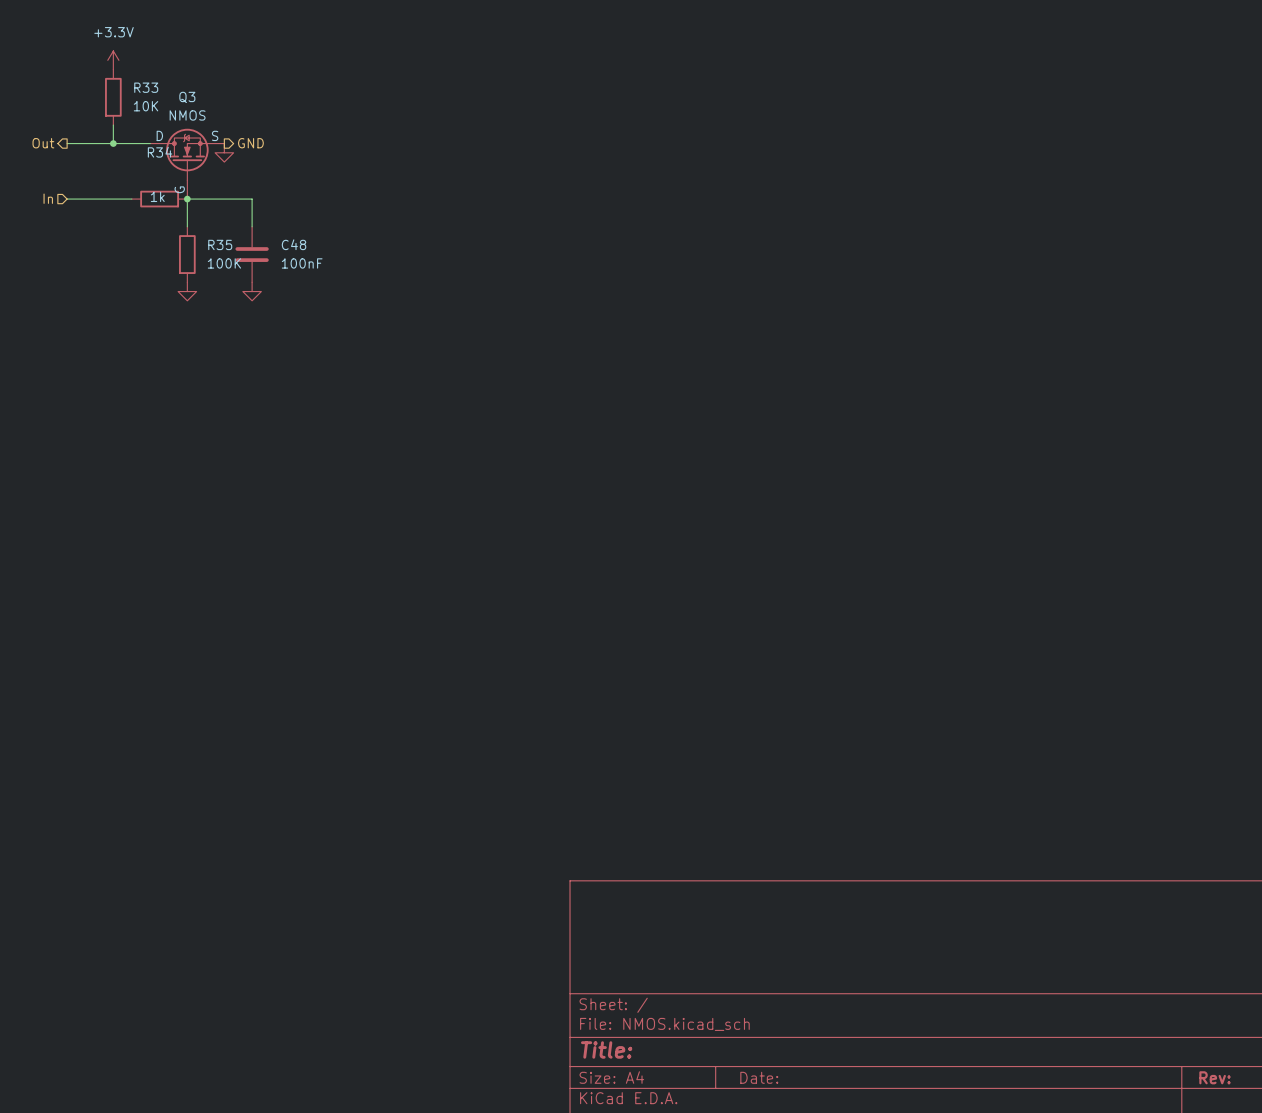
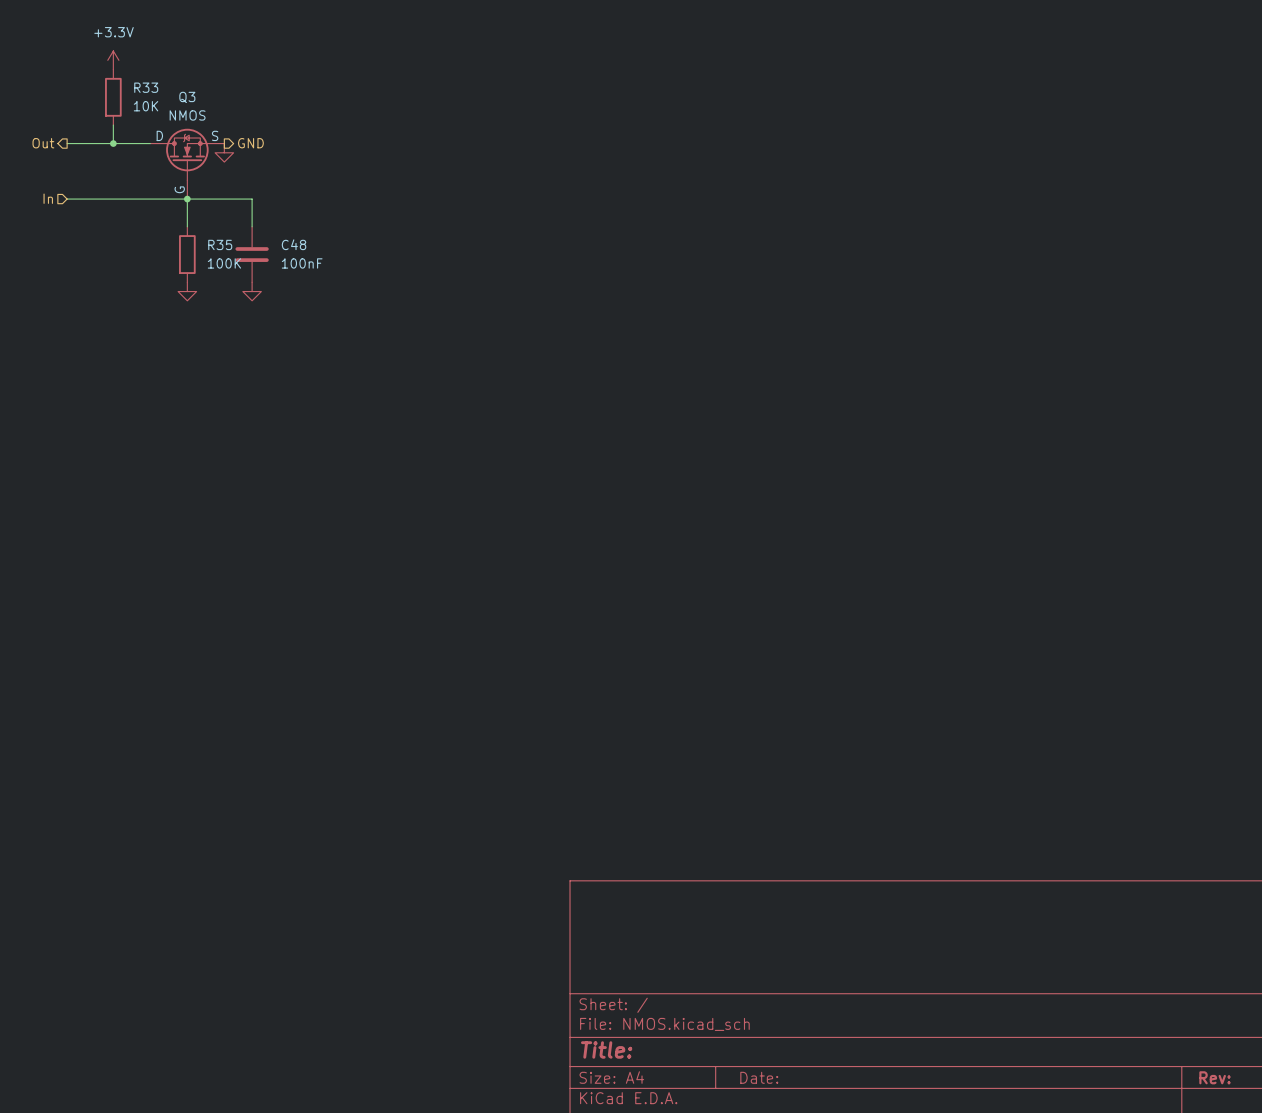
wire: none -> (131, 199) (187, 199)
R34: 1k (159, 199) -> none

